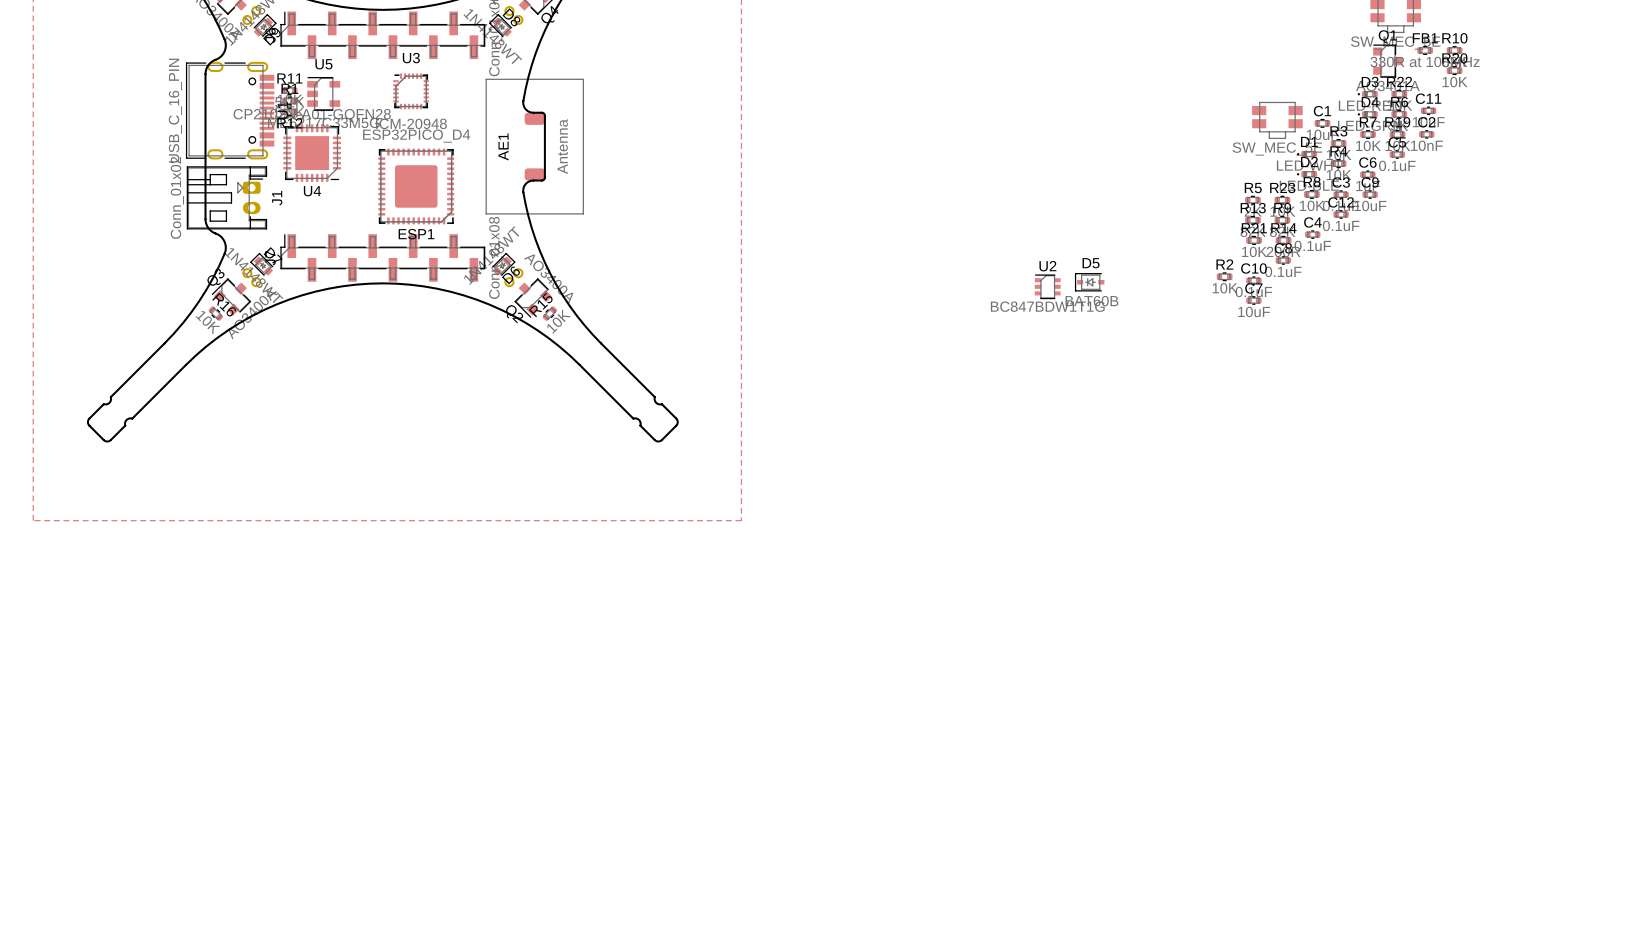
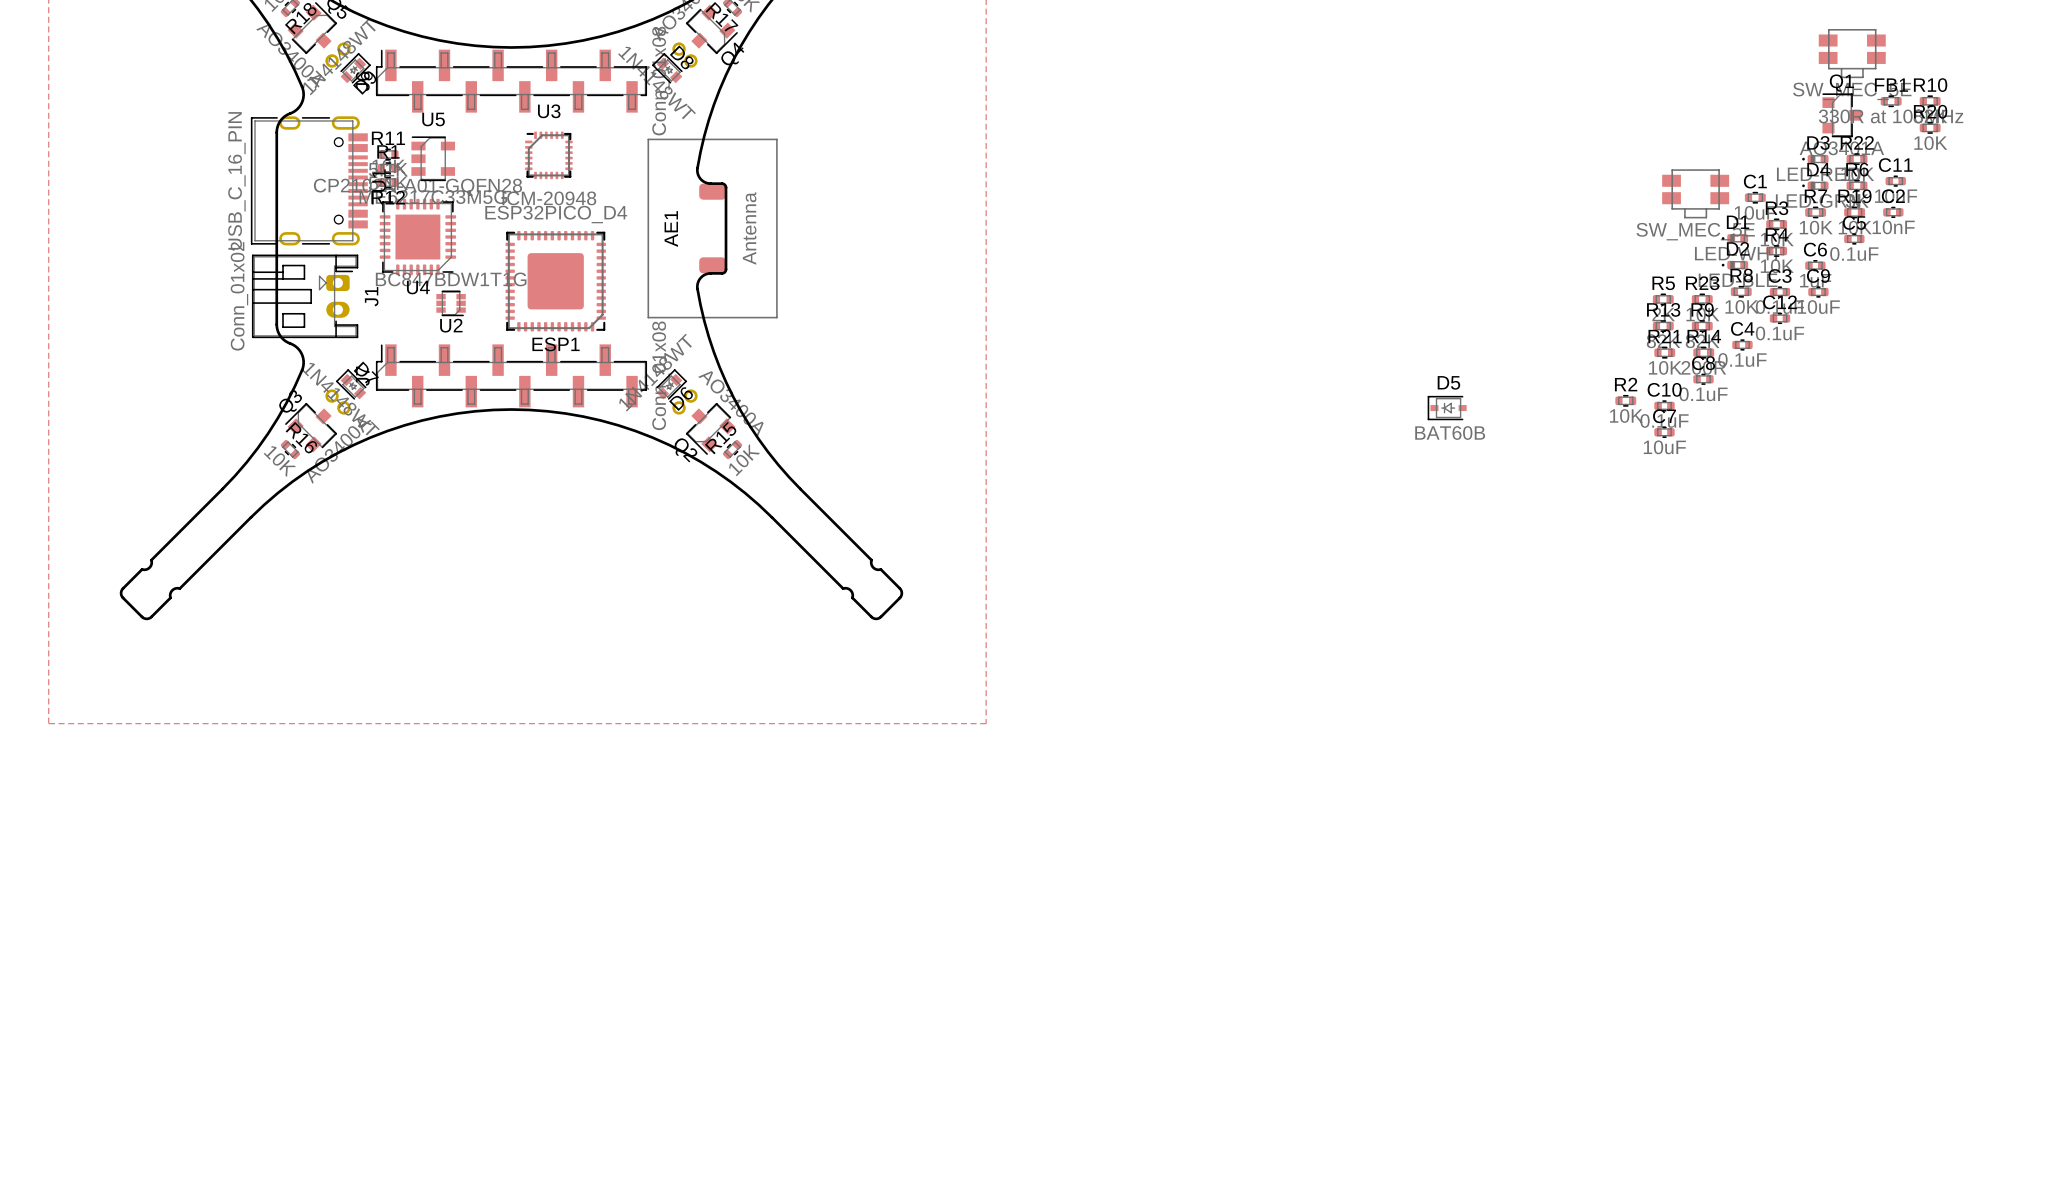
U2 name position: U2 (1047, 266) -> U2 (451, 325)
U2 footprint: [1034, 274, 1061, 300] -> [436, 290, 466, 317]
U2 value position: BC847BDW1T1G (1047, 306) -> BC847BDW1T1G (451, 279)

